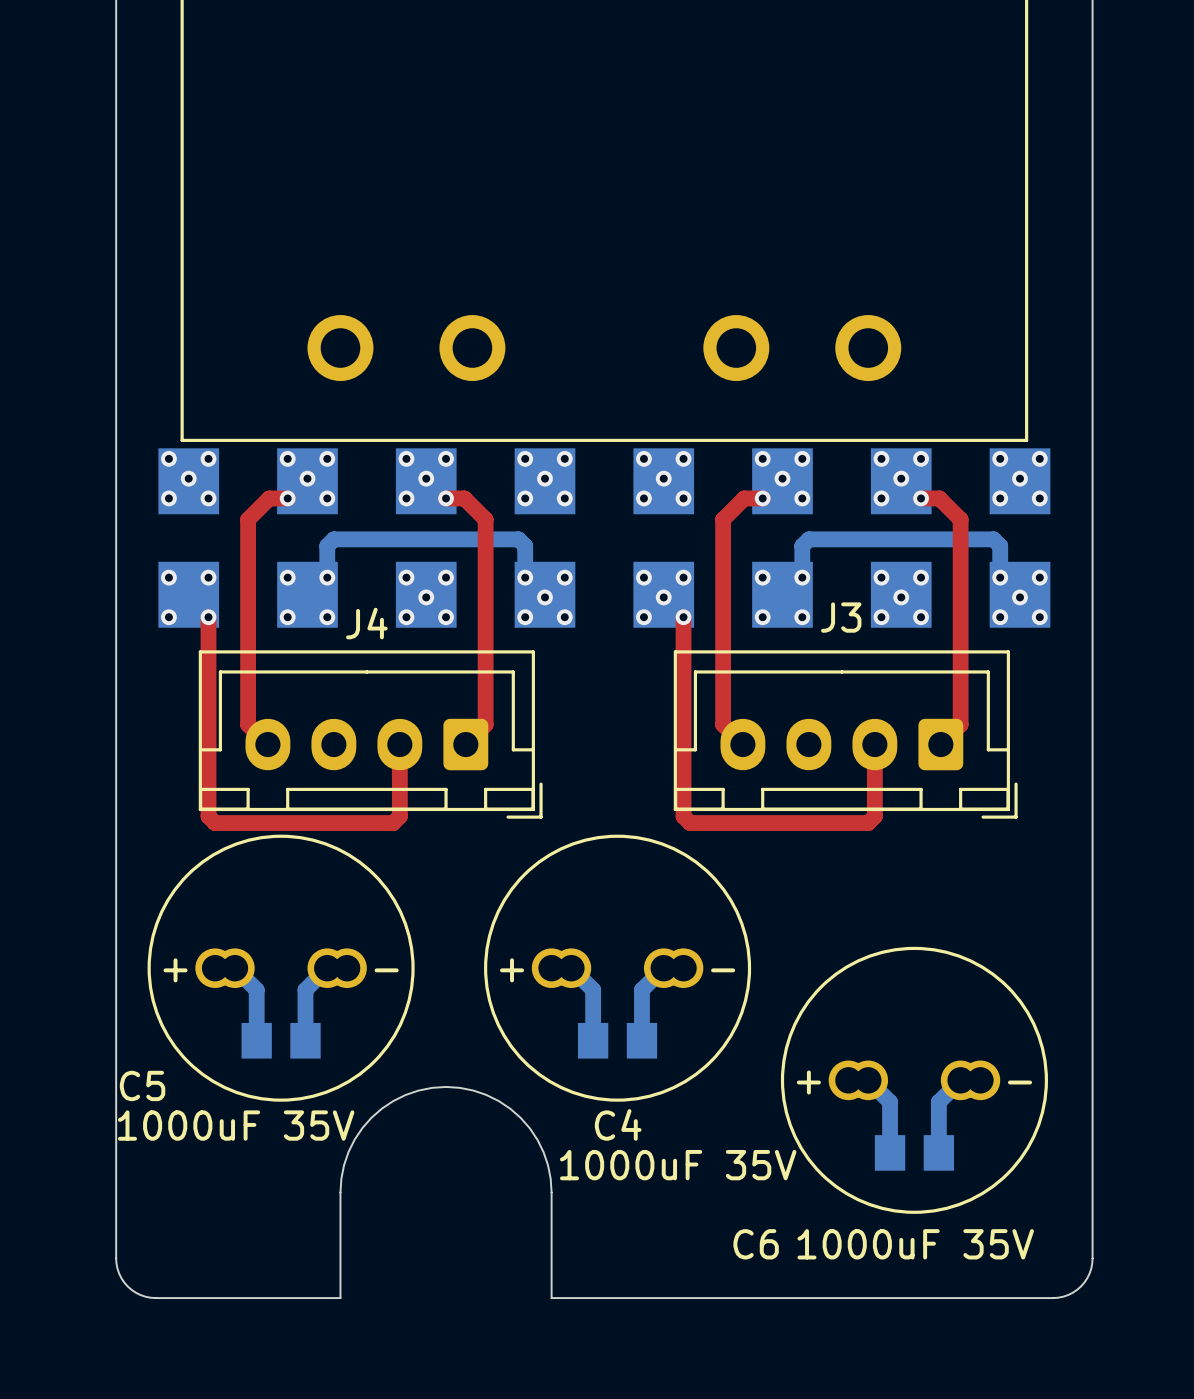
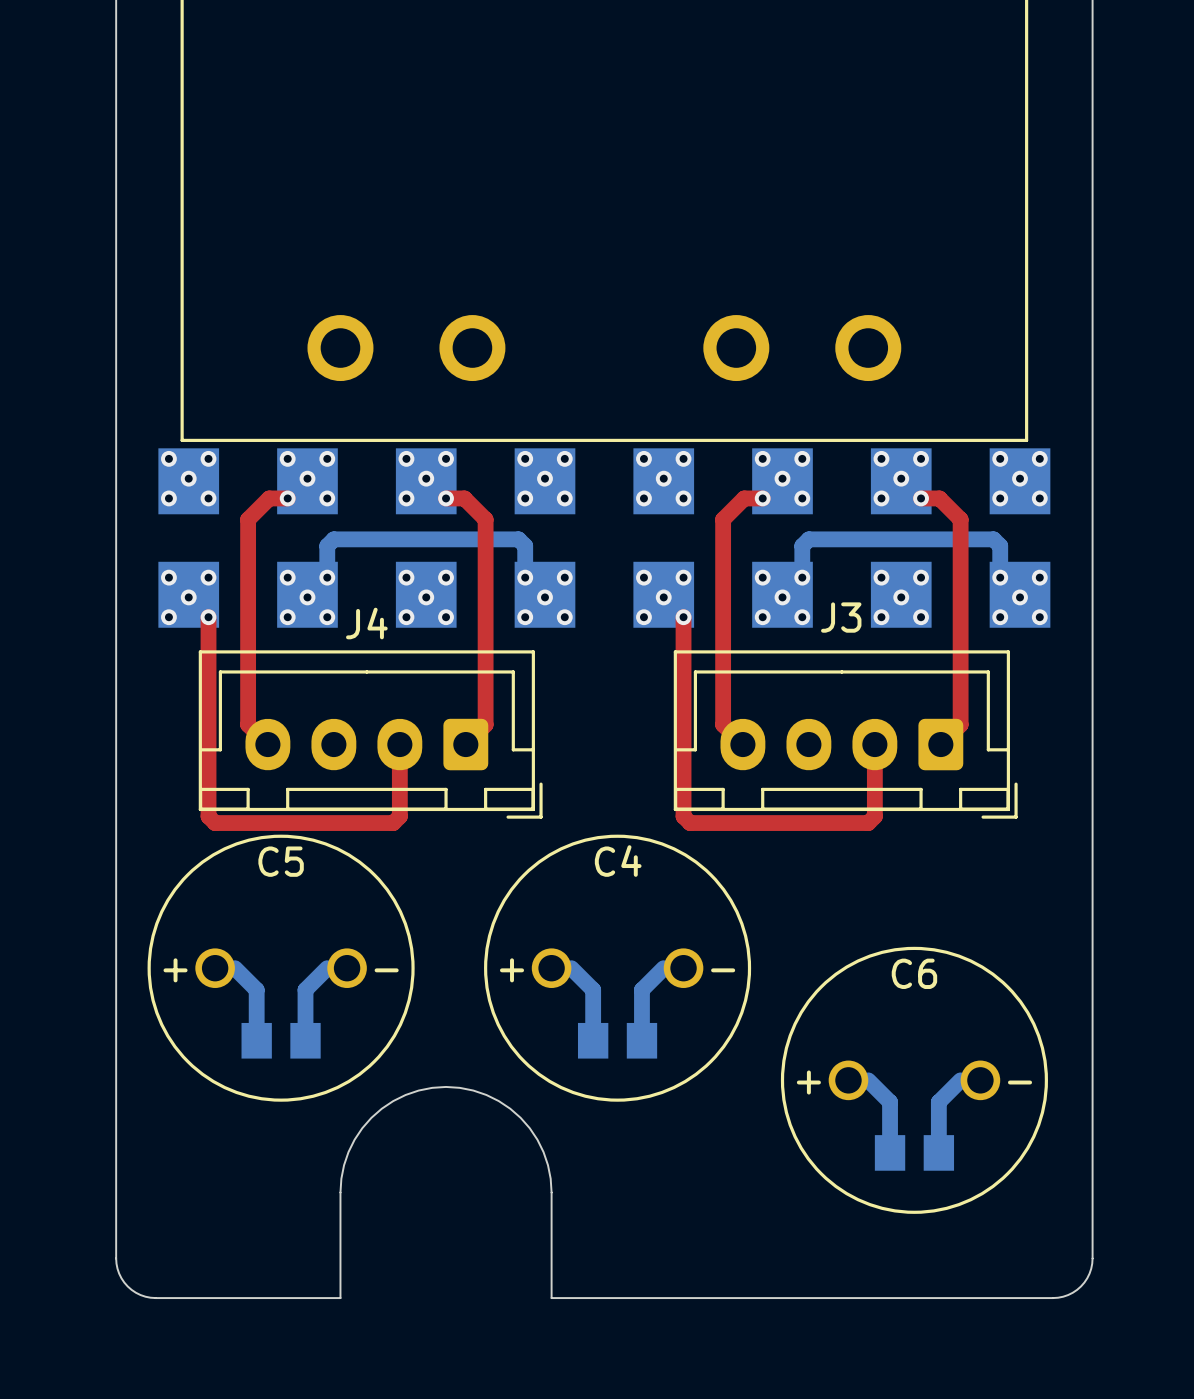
via: none -> (188, 597)
via: none -> (307, 597)
via: none -> (782, 597)
C5 footprint: [147, 834, 415, 1102] -> [147, 834, 415, 1102]
C4 footprint: [484, 834, 752, 1102] -> [484, 834, 752, 1102]
C6 footprint: [780, 946, 1048, 1214] -> [780, 946, 1048, 1214]
C5 name position: C5 (142, 1085) -> C5 (281, 861)
C4 name position: C4 (618, 1124) -> C4 (618, 861)
C5 value: 1000uF 35V (236, 1125) -> none
C4 value: 1000uF 35V (678, 1165) -> none
C6 name position: C6 (756, 1244) -> C6 (914, 973)
C6 value: 1000uF 35V (915, 1244) -> none

